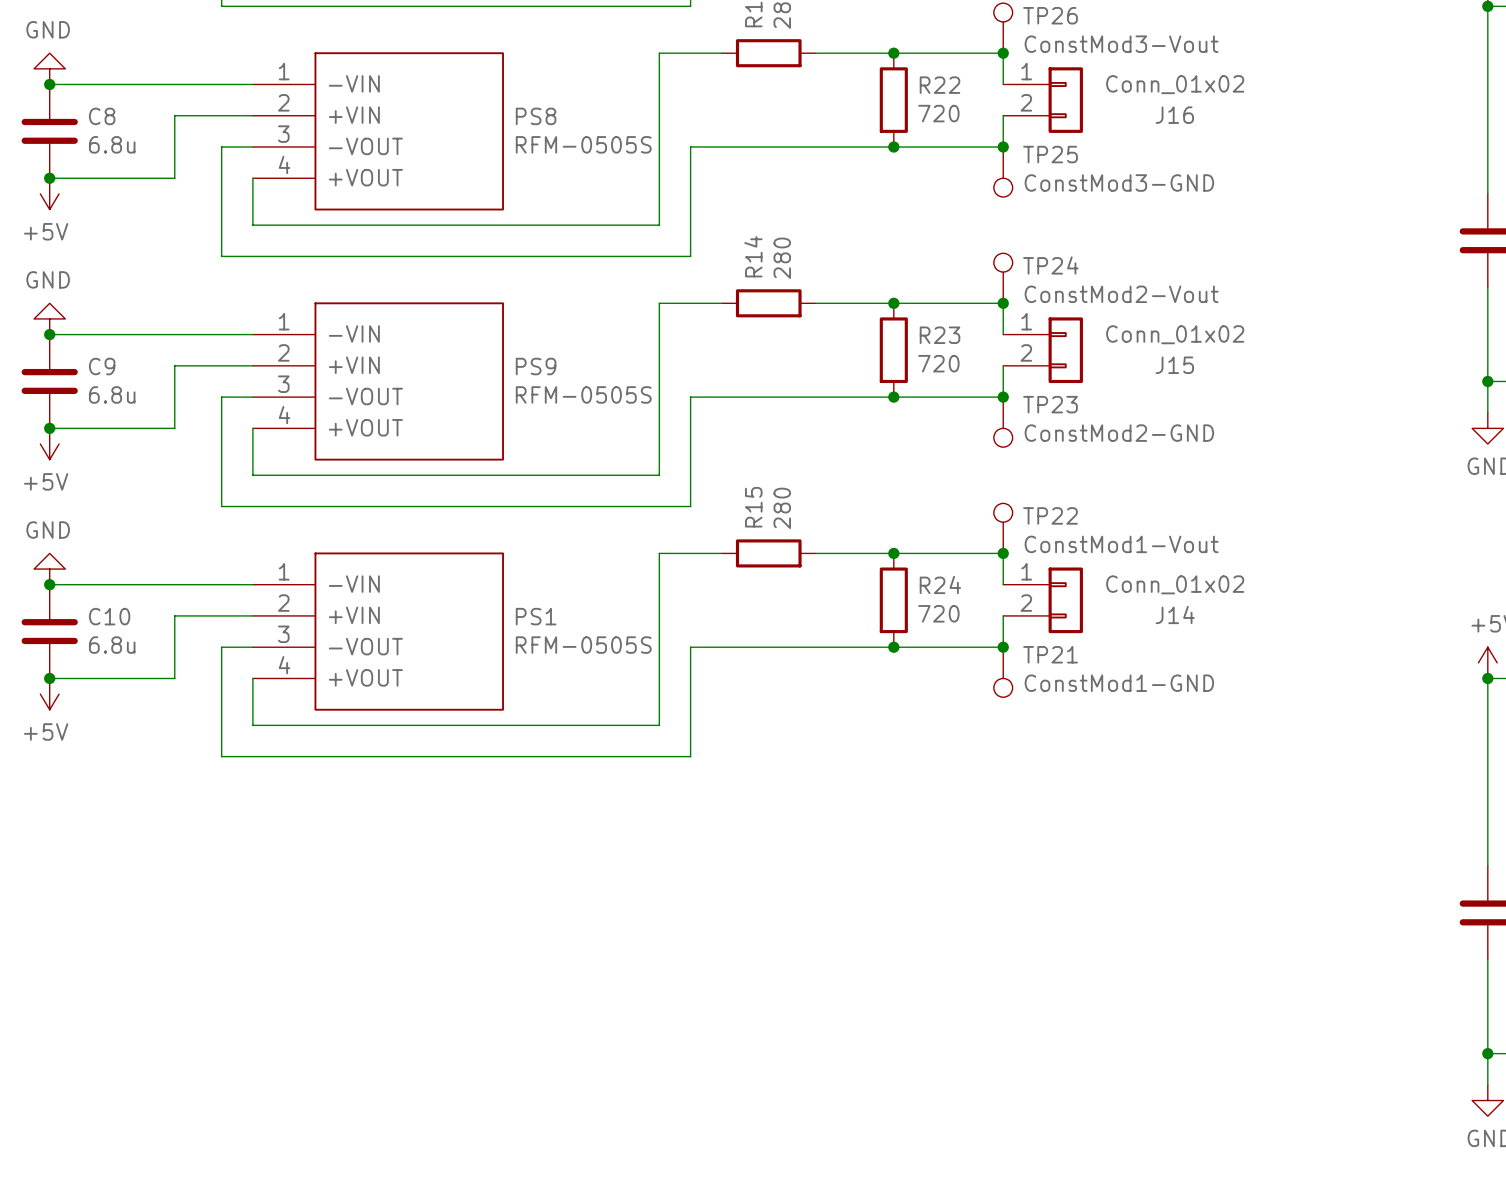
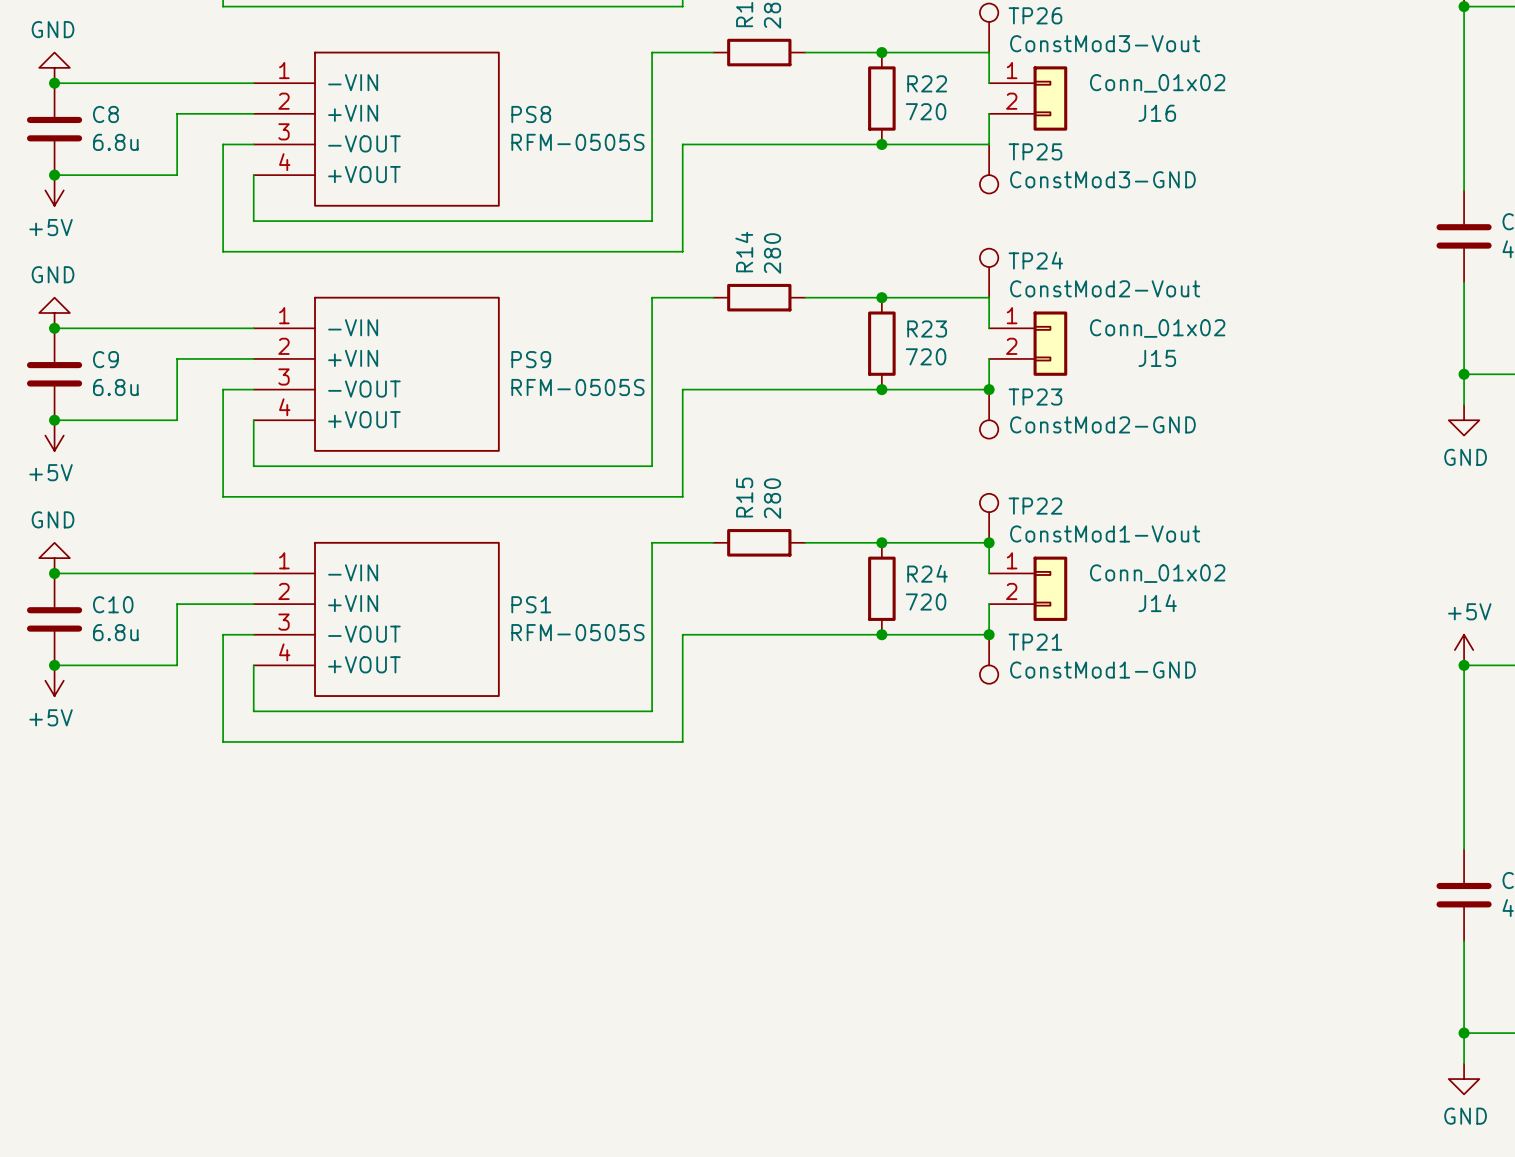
junction: (1003, 53) -> none
junction: (1003, 147) -> none
junction: (1003, 303) -> none

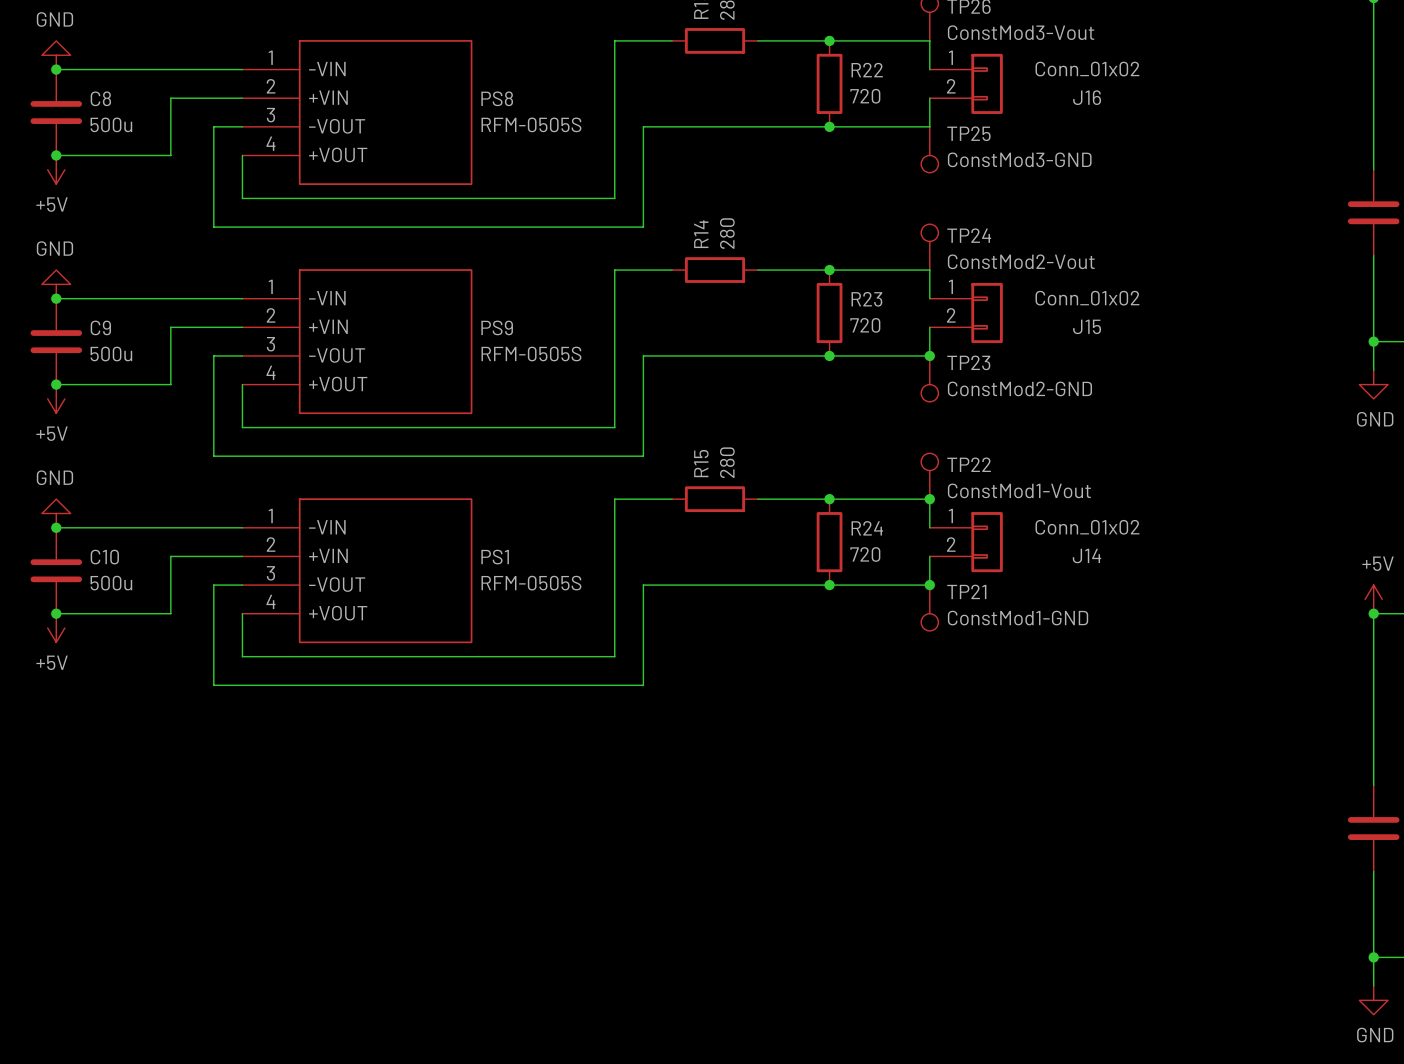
C8 value: 6.8u (115, 142) -> 500u (111, 124)
C9 value: 6.8u (115, 387) -> 500u (111, 354)
C10 value: 6.8u (115, 632) -> 500u (111, 583)

